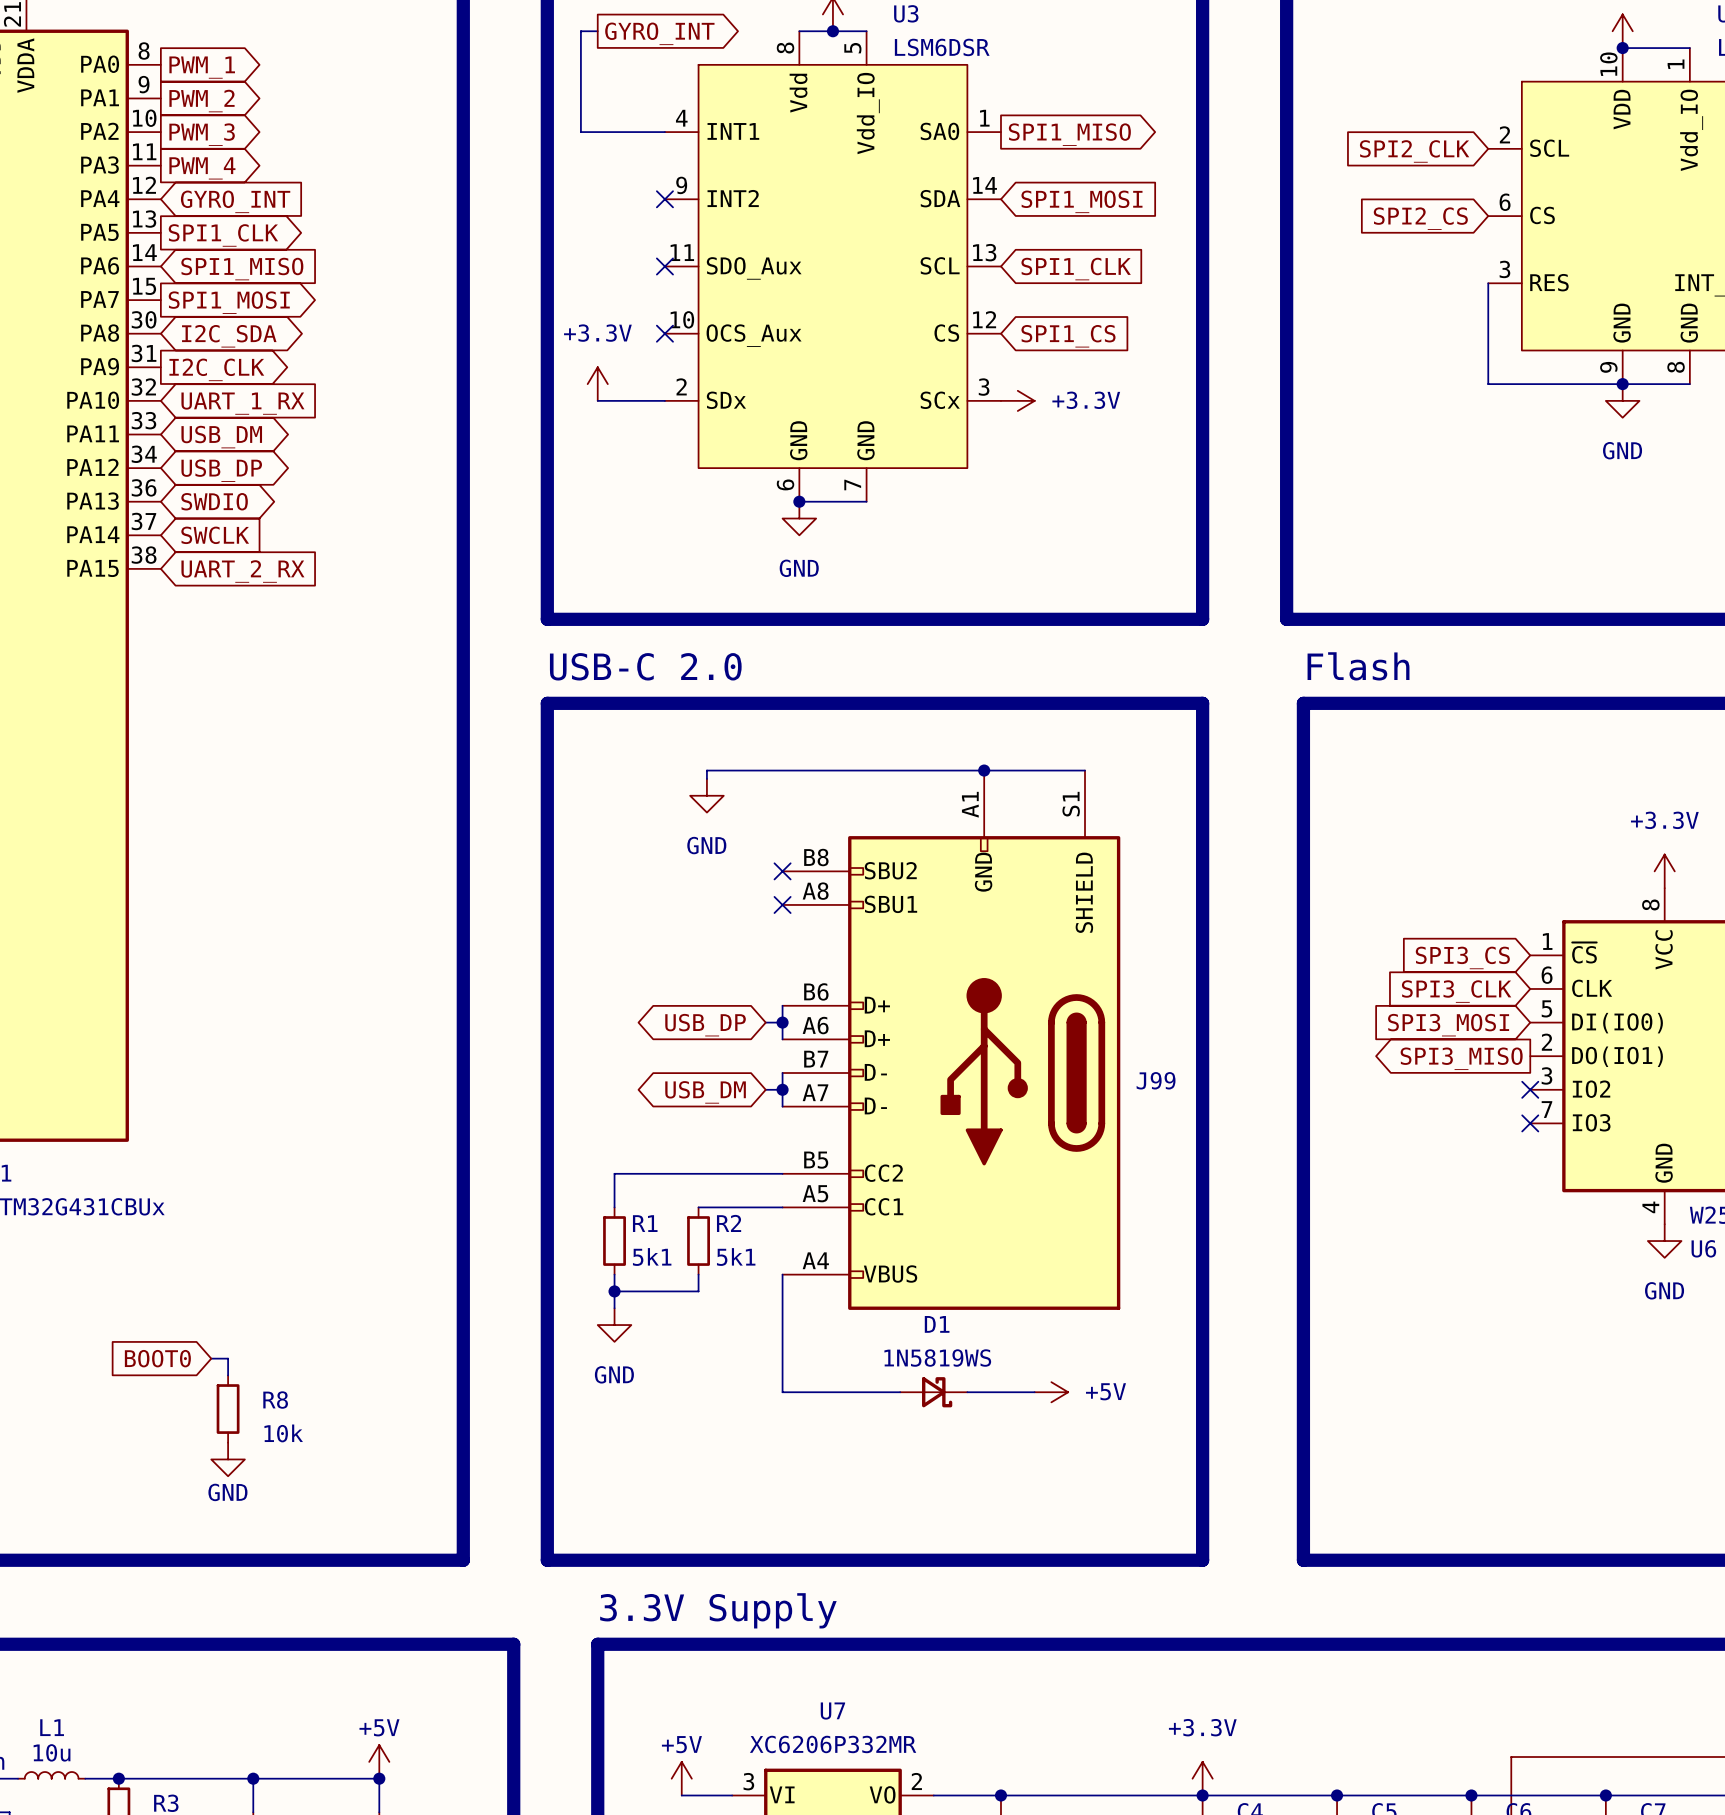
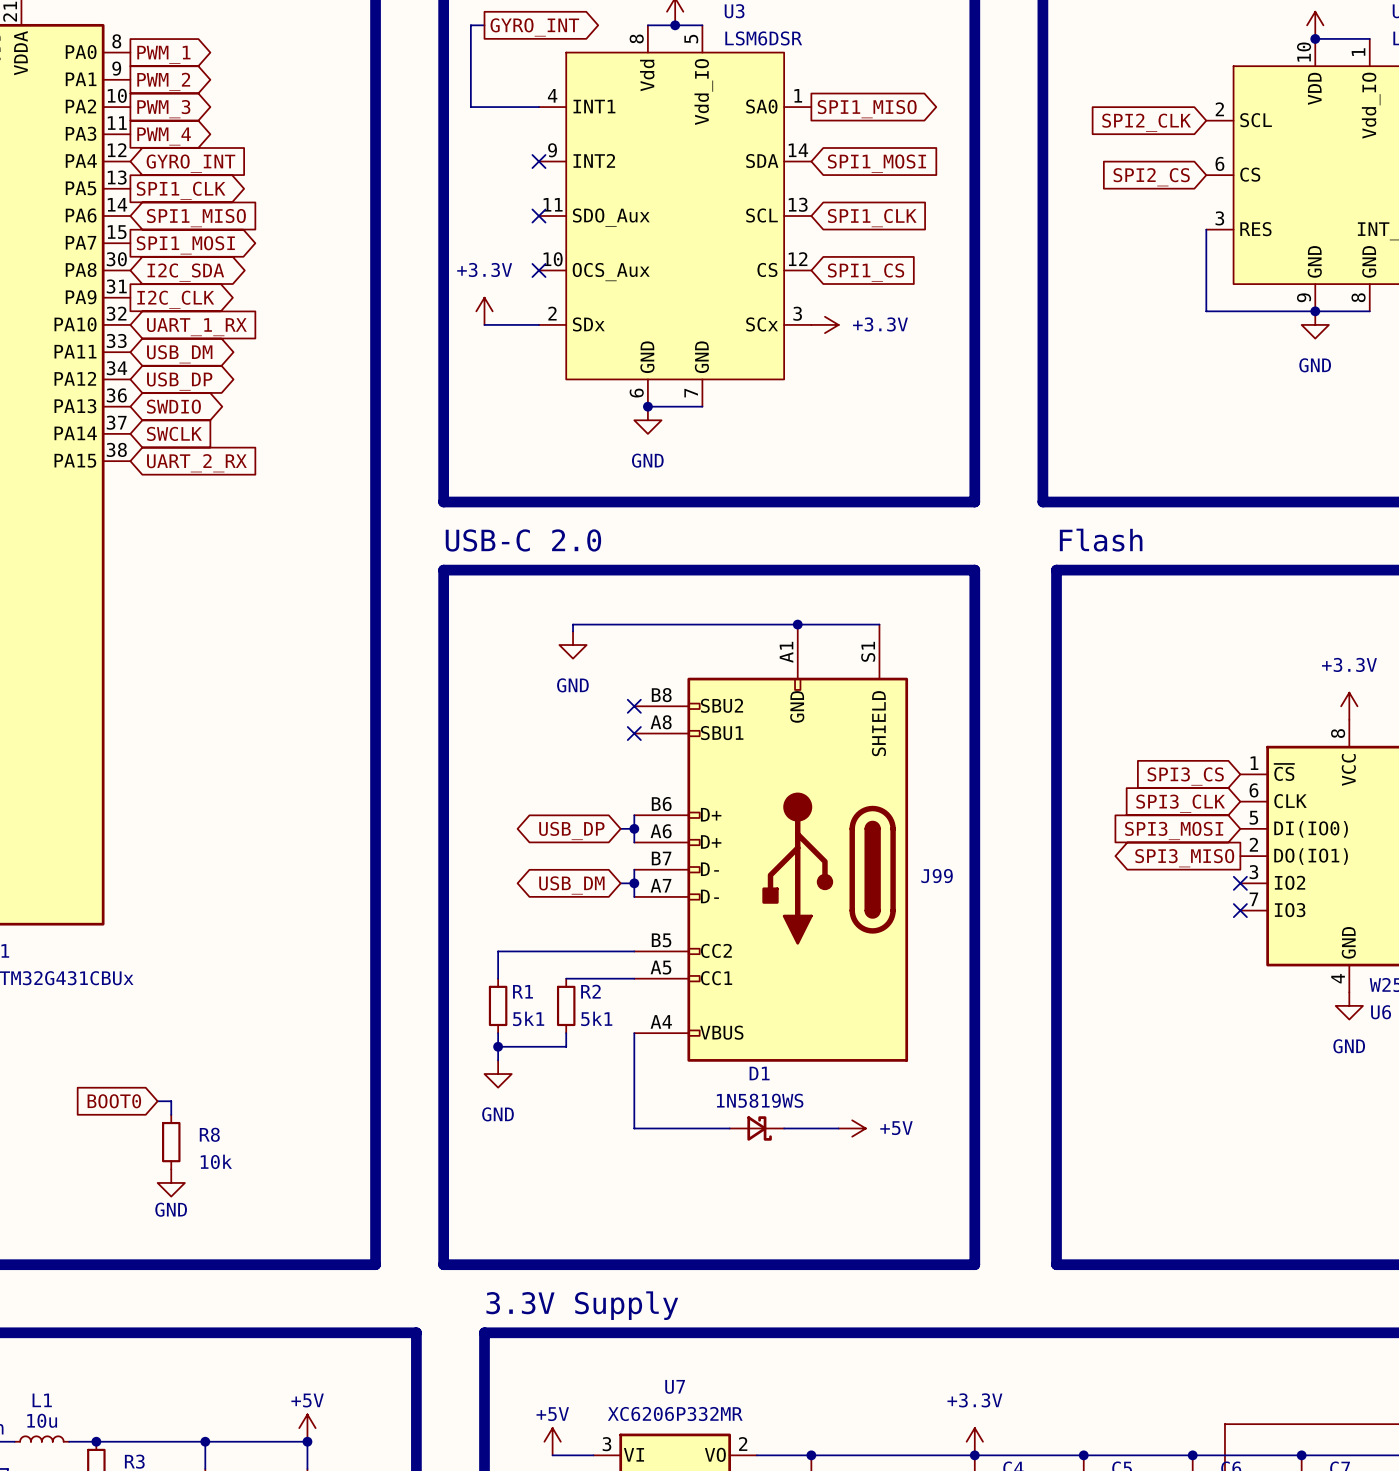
global label position: BOOT0 (157, 1358) -> BOOT0 (114, 1101)
wire: (211, 1358) (228, 1358) (228, 1375) -> (157, 1101) (171, 1101) (171, 1114)
R8 position: (228, 1409) -> (171, 1142)
power symbol position: GND (228, 1459) -> GND (171, 1182)

